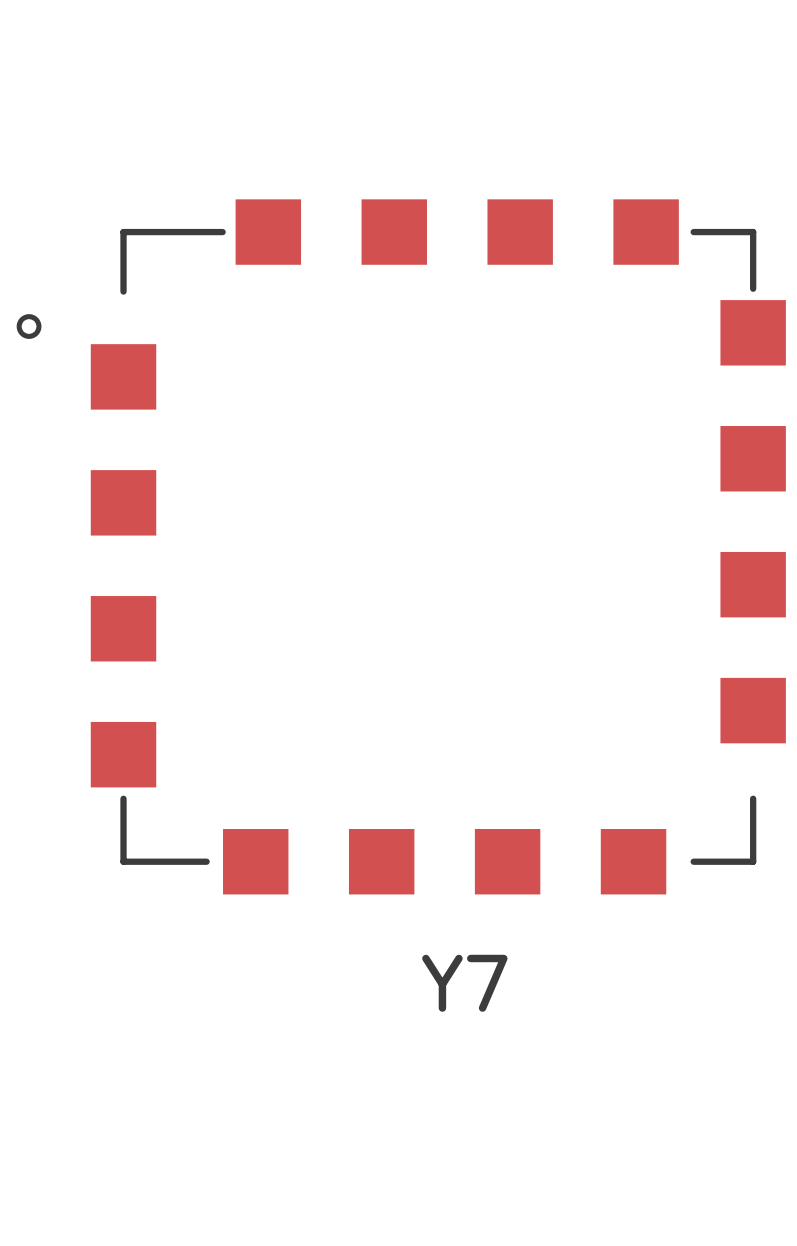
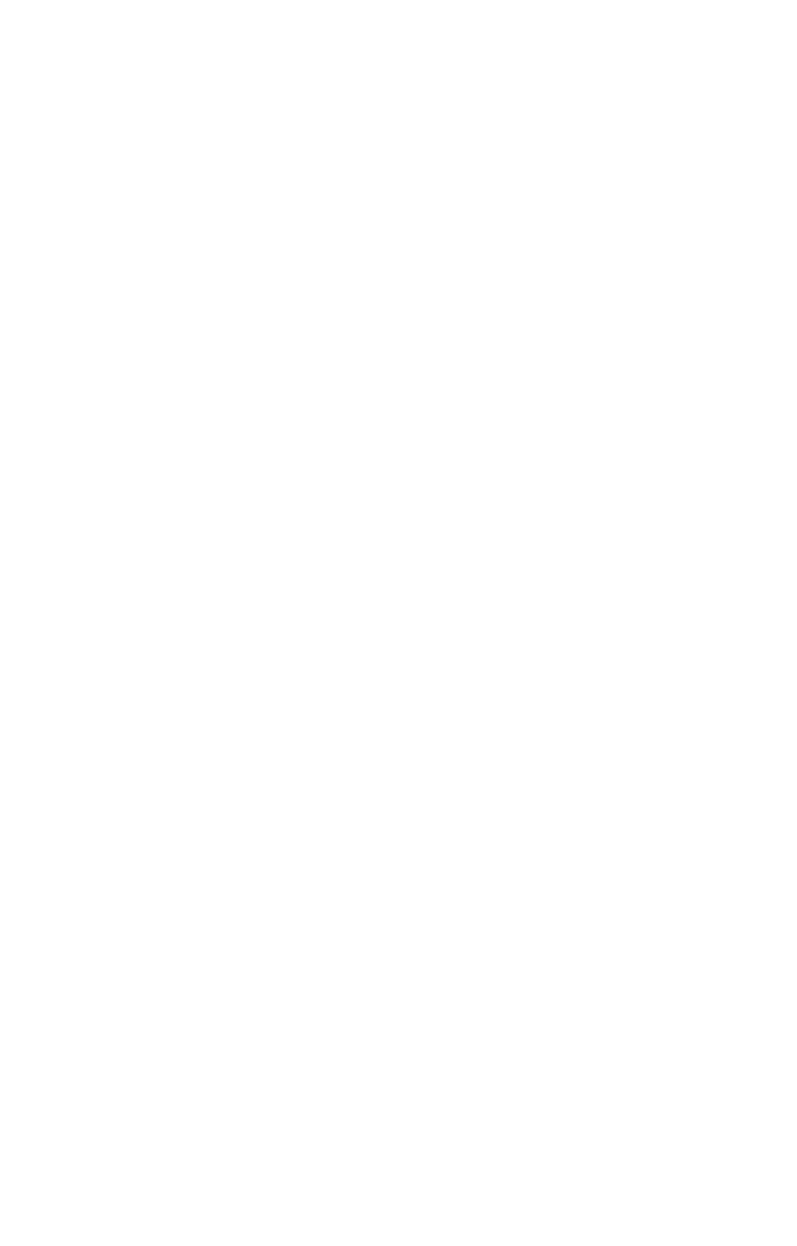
Y7: (401, 546) -> none

